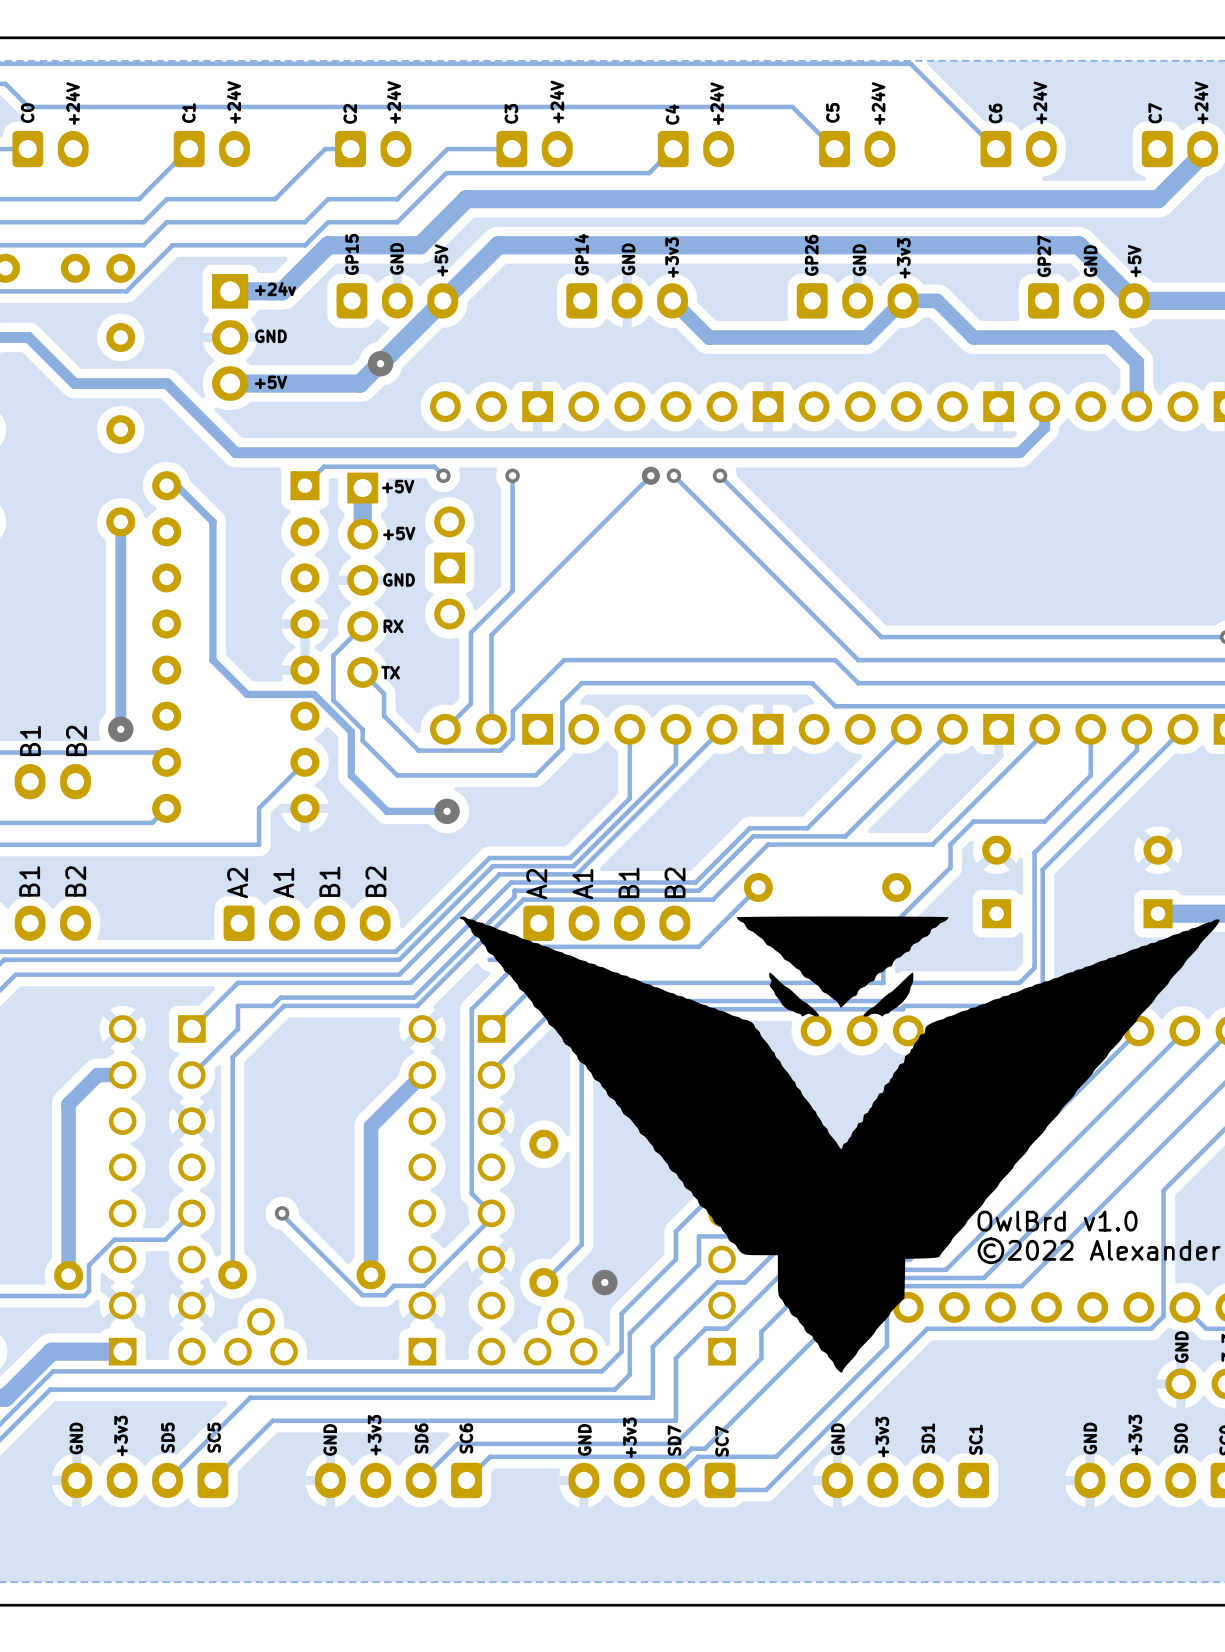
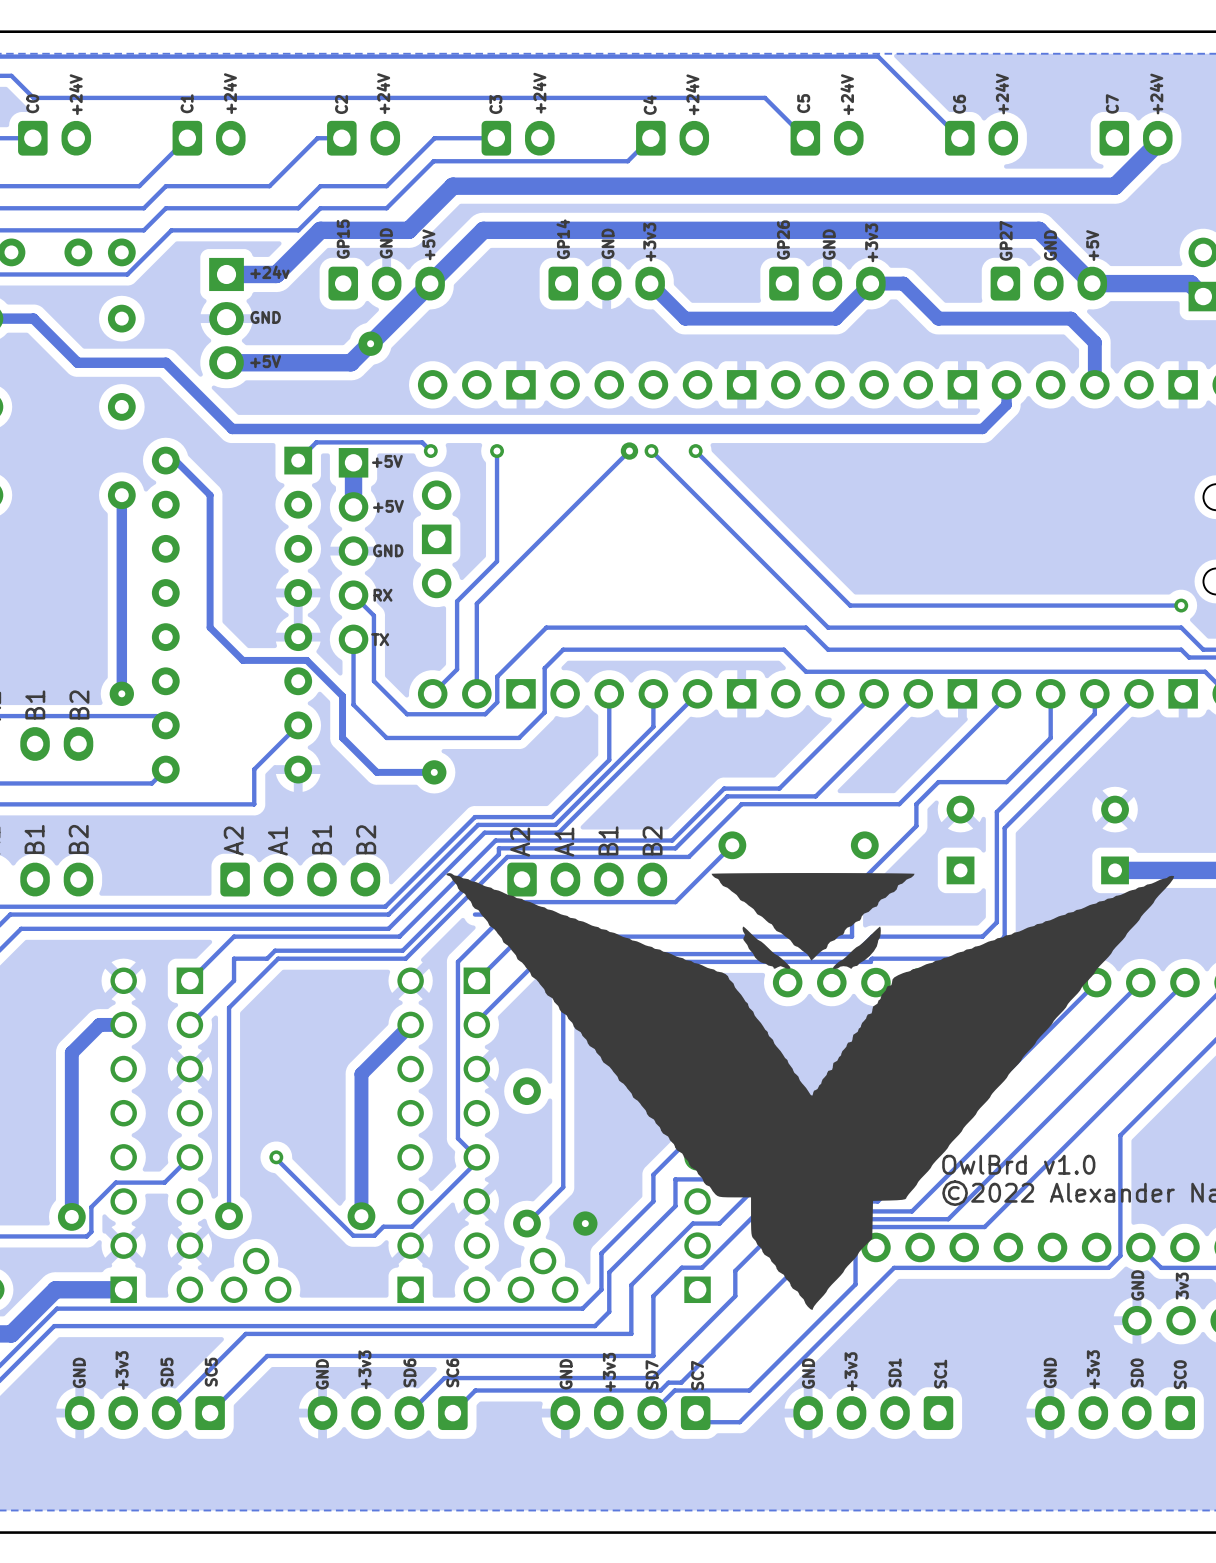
track: (362, 626) (333, 655) (333, 700) (362, 729) -> (353, 595) (373, 615) (373, 659)
track: (362, 672) (384, 693) -> (353, 639) (353, 694)

